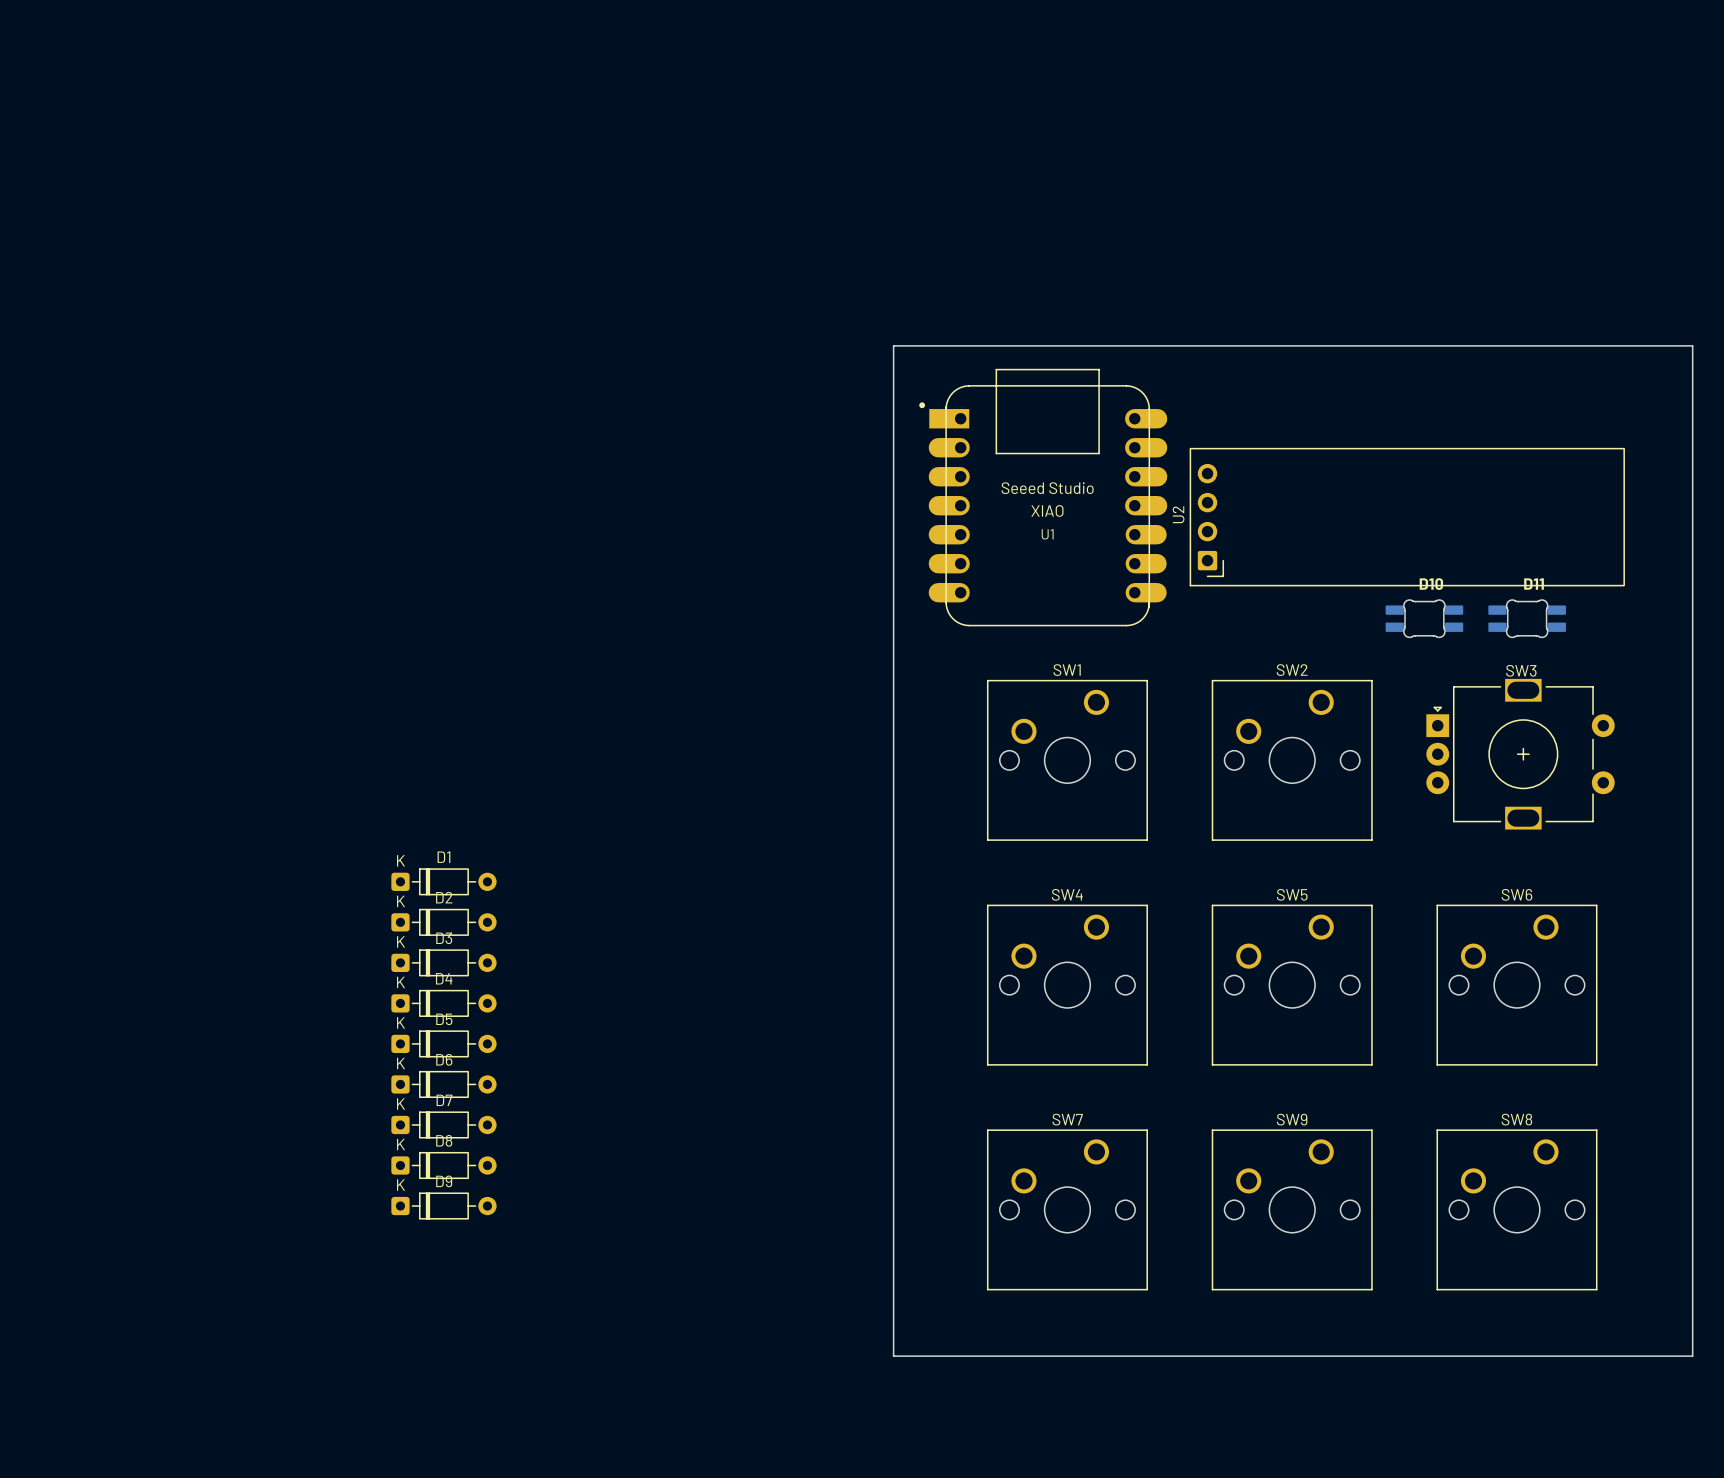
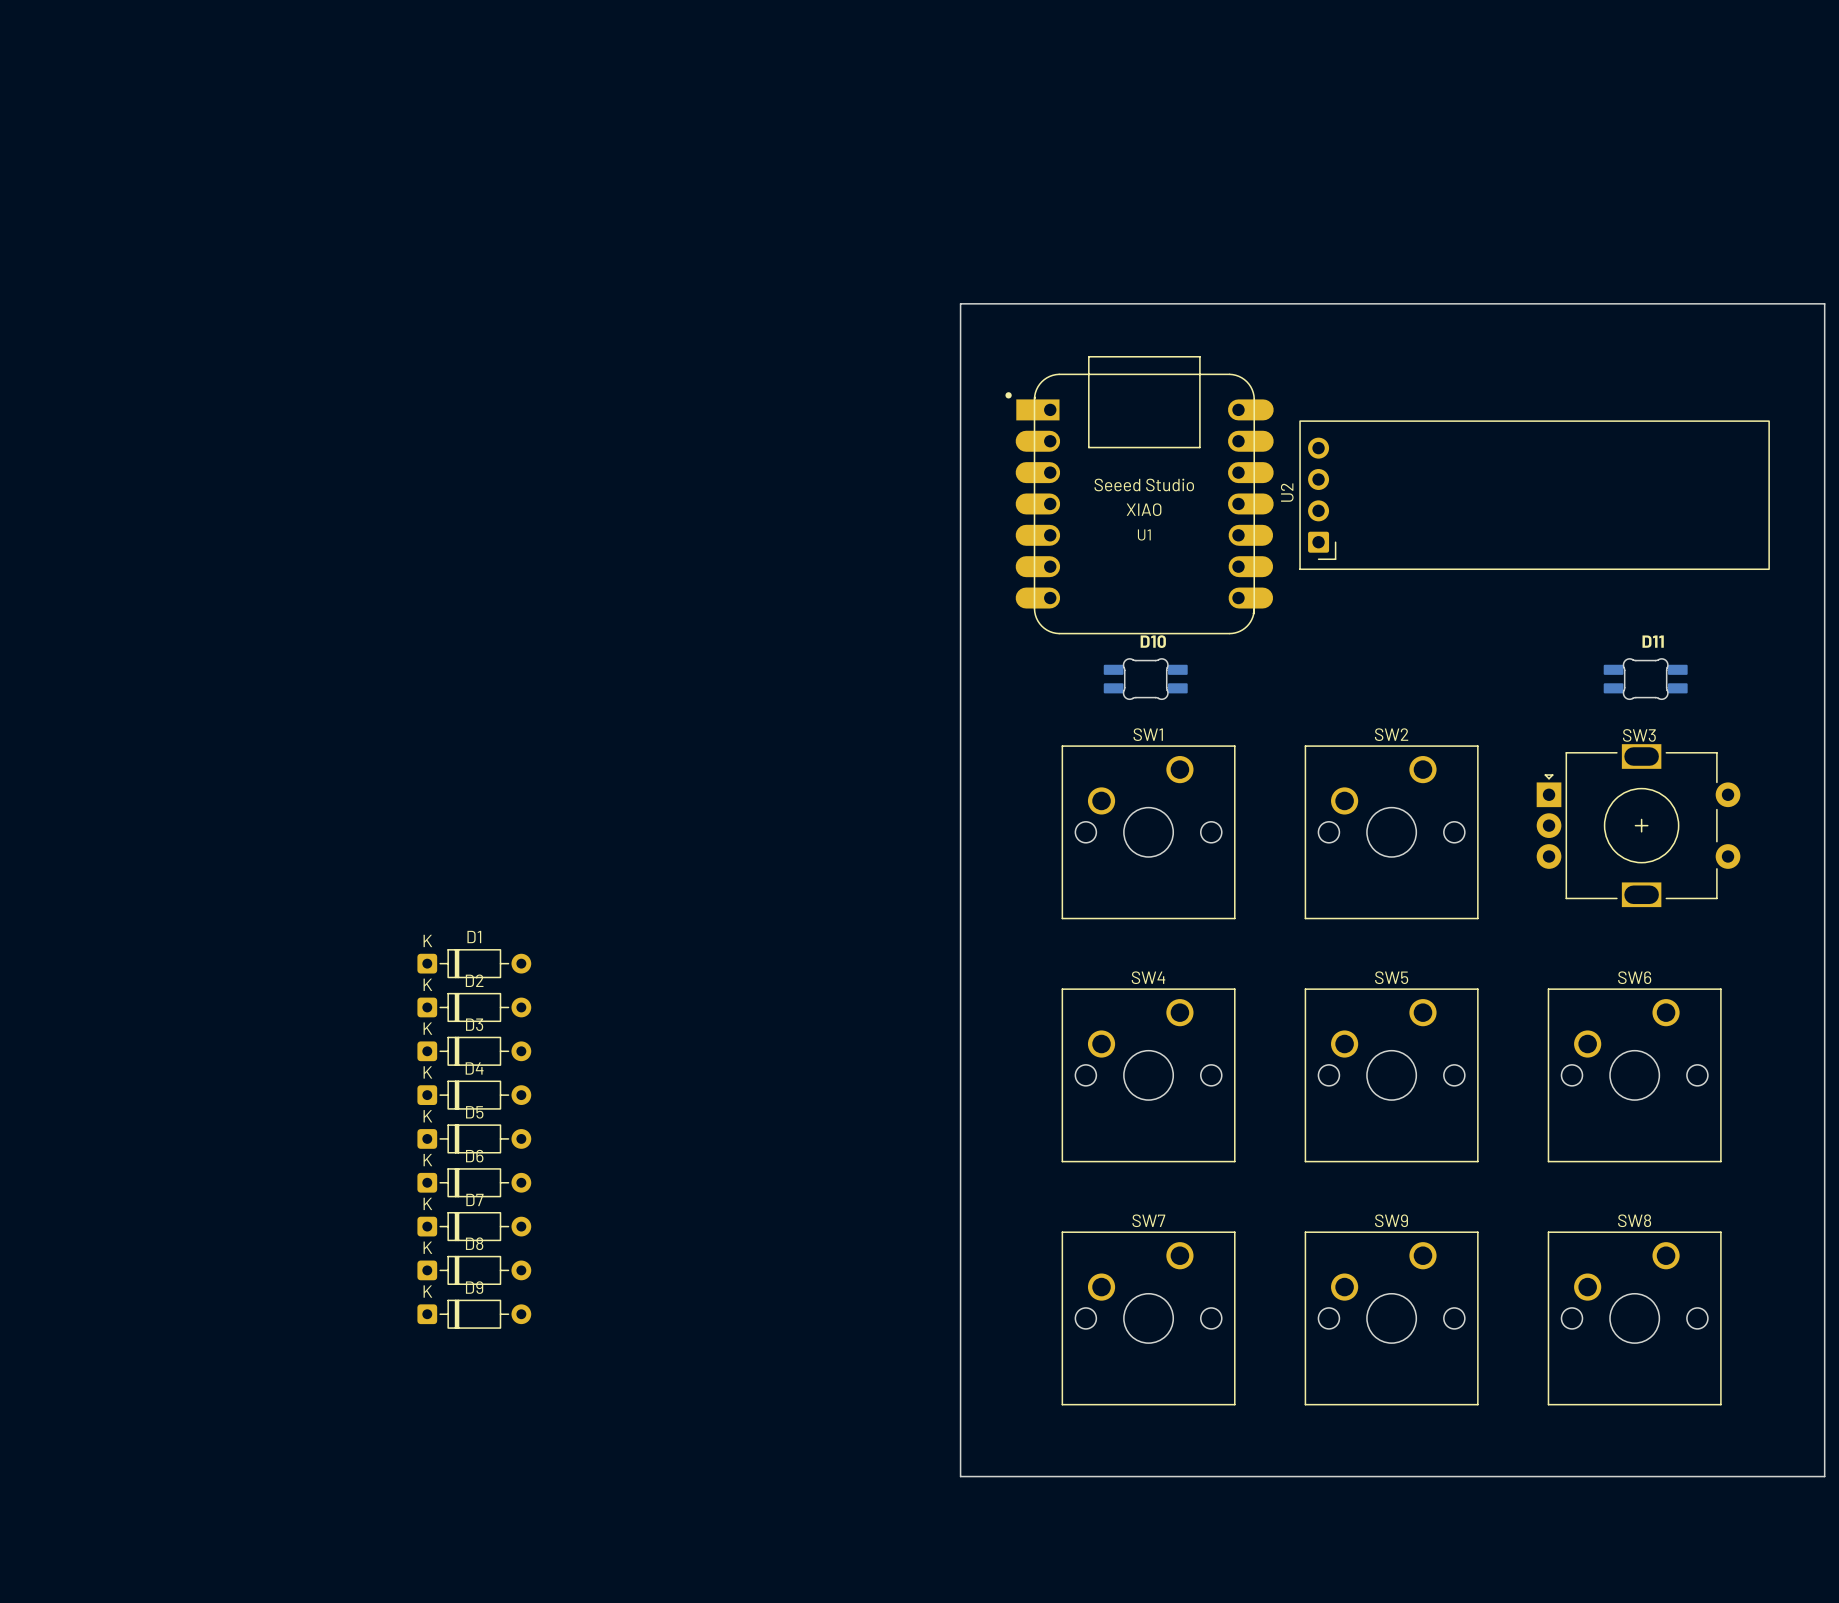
board edge: (893, 345) (1692, 345) -> (960, 384) (960, 303) (1824, 303) (1824, 384)
U1 position: (1043, 497) -> (1139, 495)
U2 position: (1407, 517) -> (1534, 495)
D10 position: (1424, 618) -> (1145, 679)

